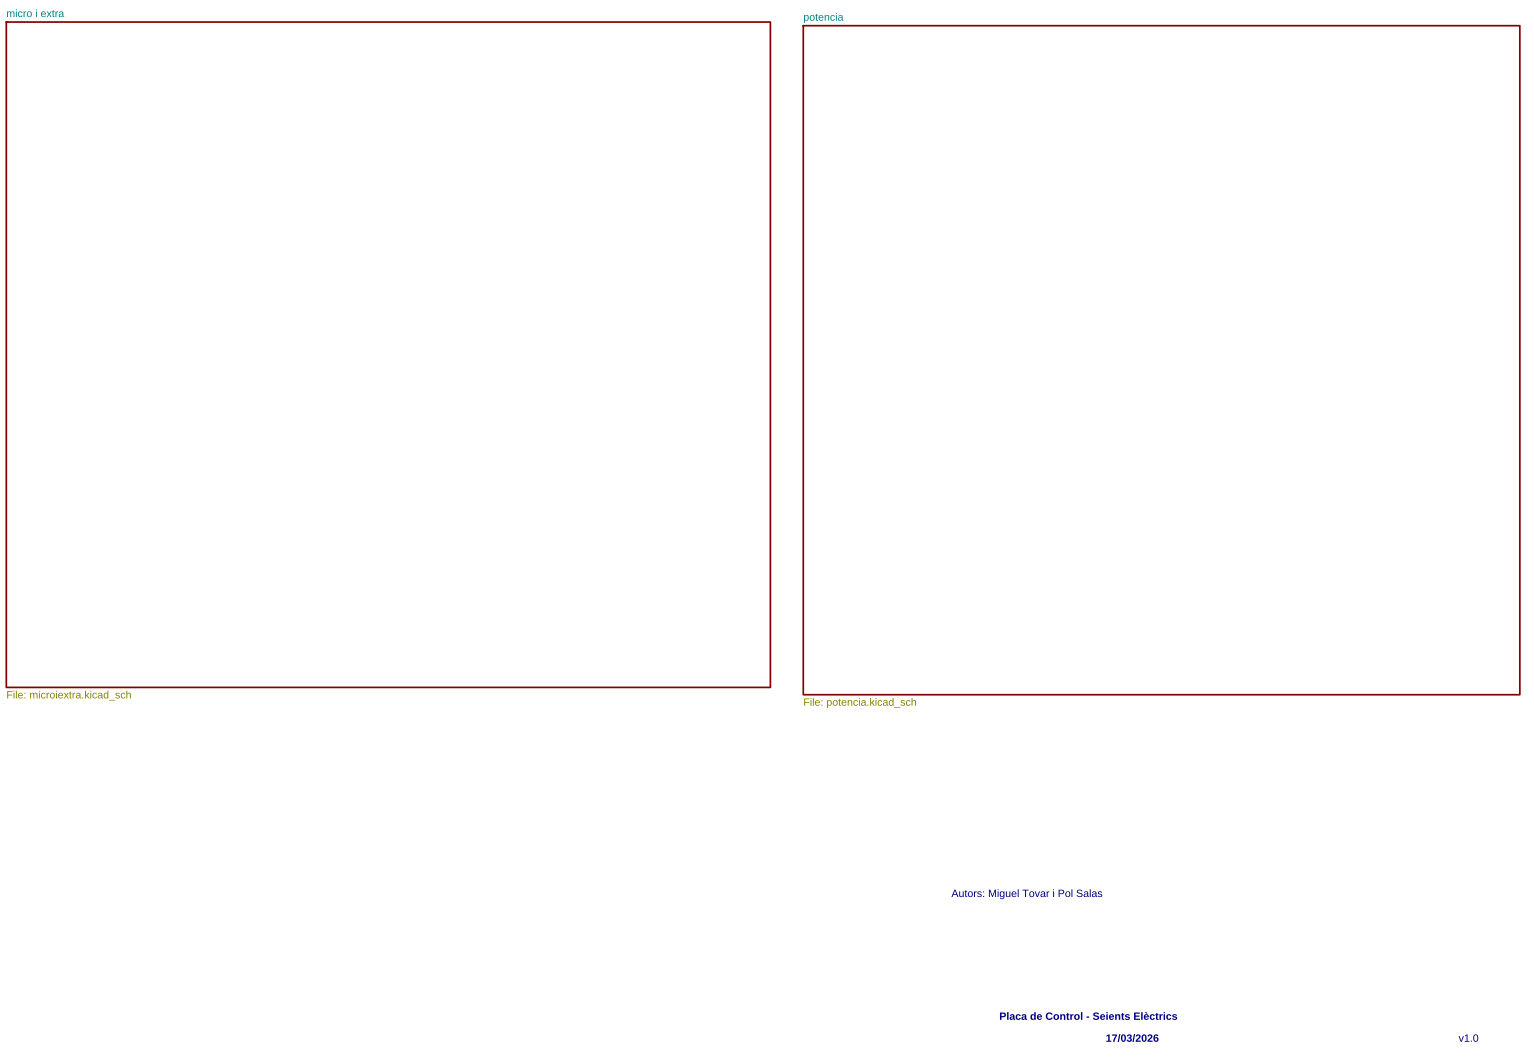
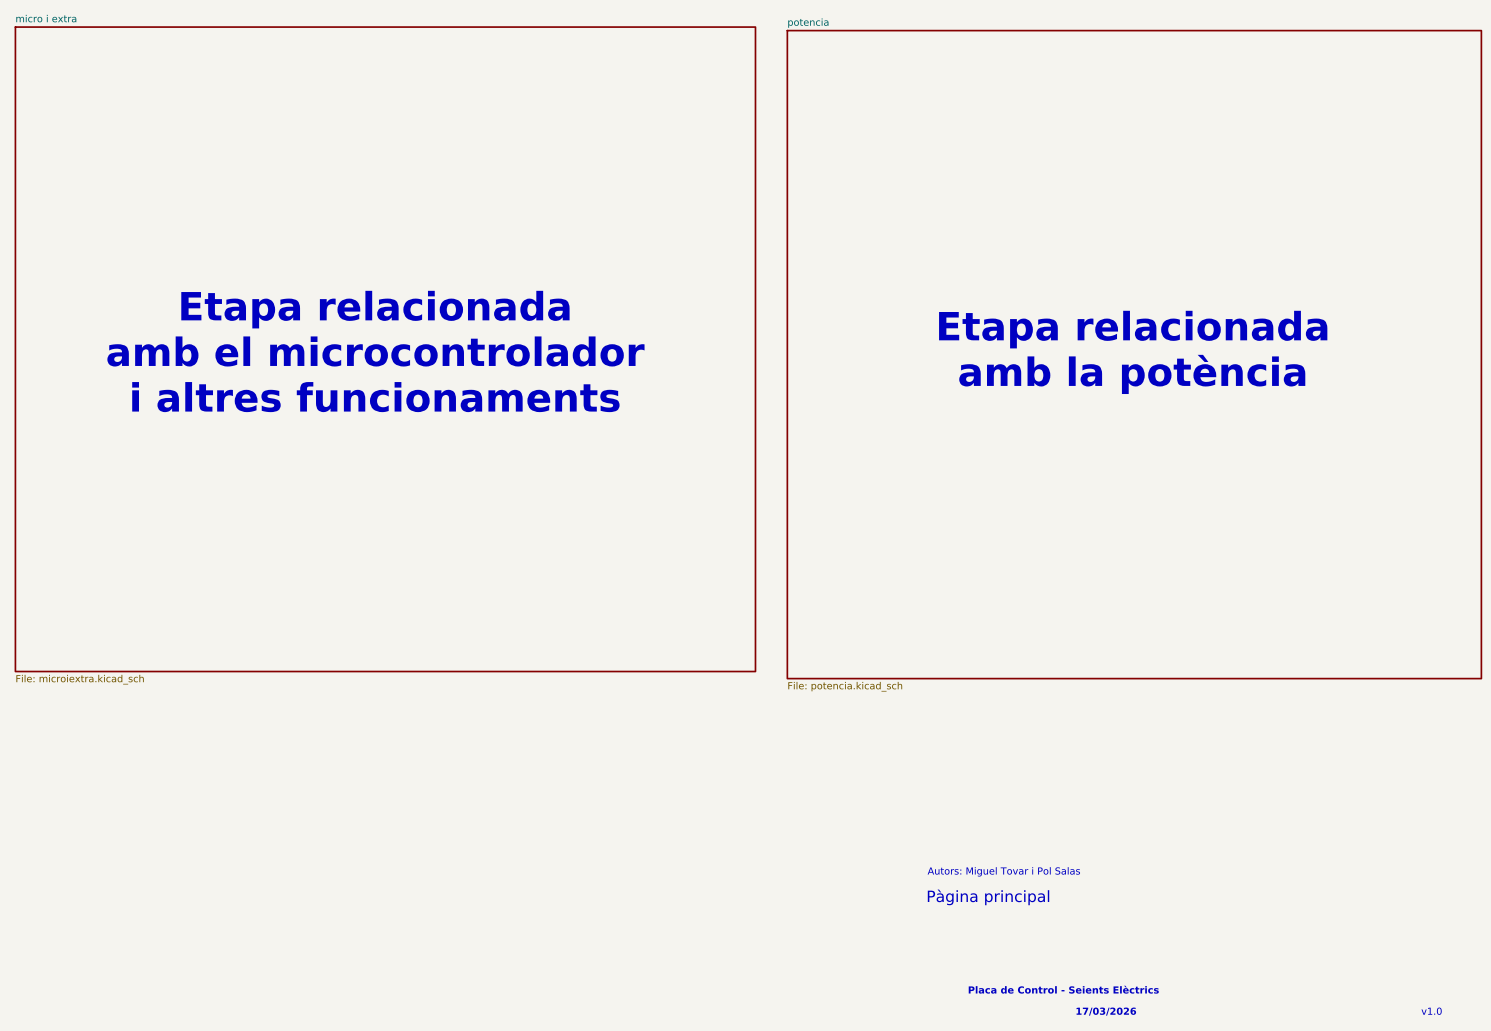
text: none -> Etapa relacionada (375, 309)
text: none -> Etapa relacionada (1133, 329)
text: none -> amb el microcontrolador (375, 351)
text: none -> amb la potència (1132, 374)
text: none -> i altres funcionaments (375, 397)
text: none -> Pàgina principal (988, 897)

